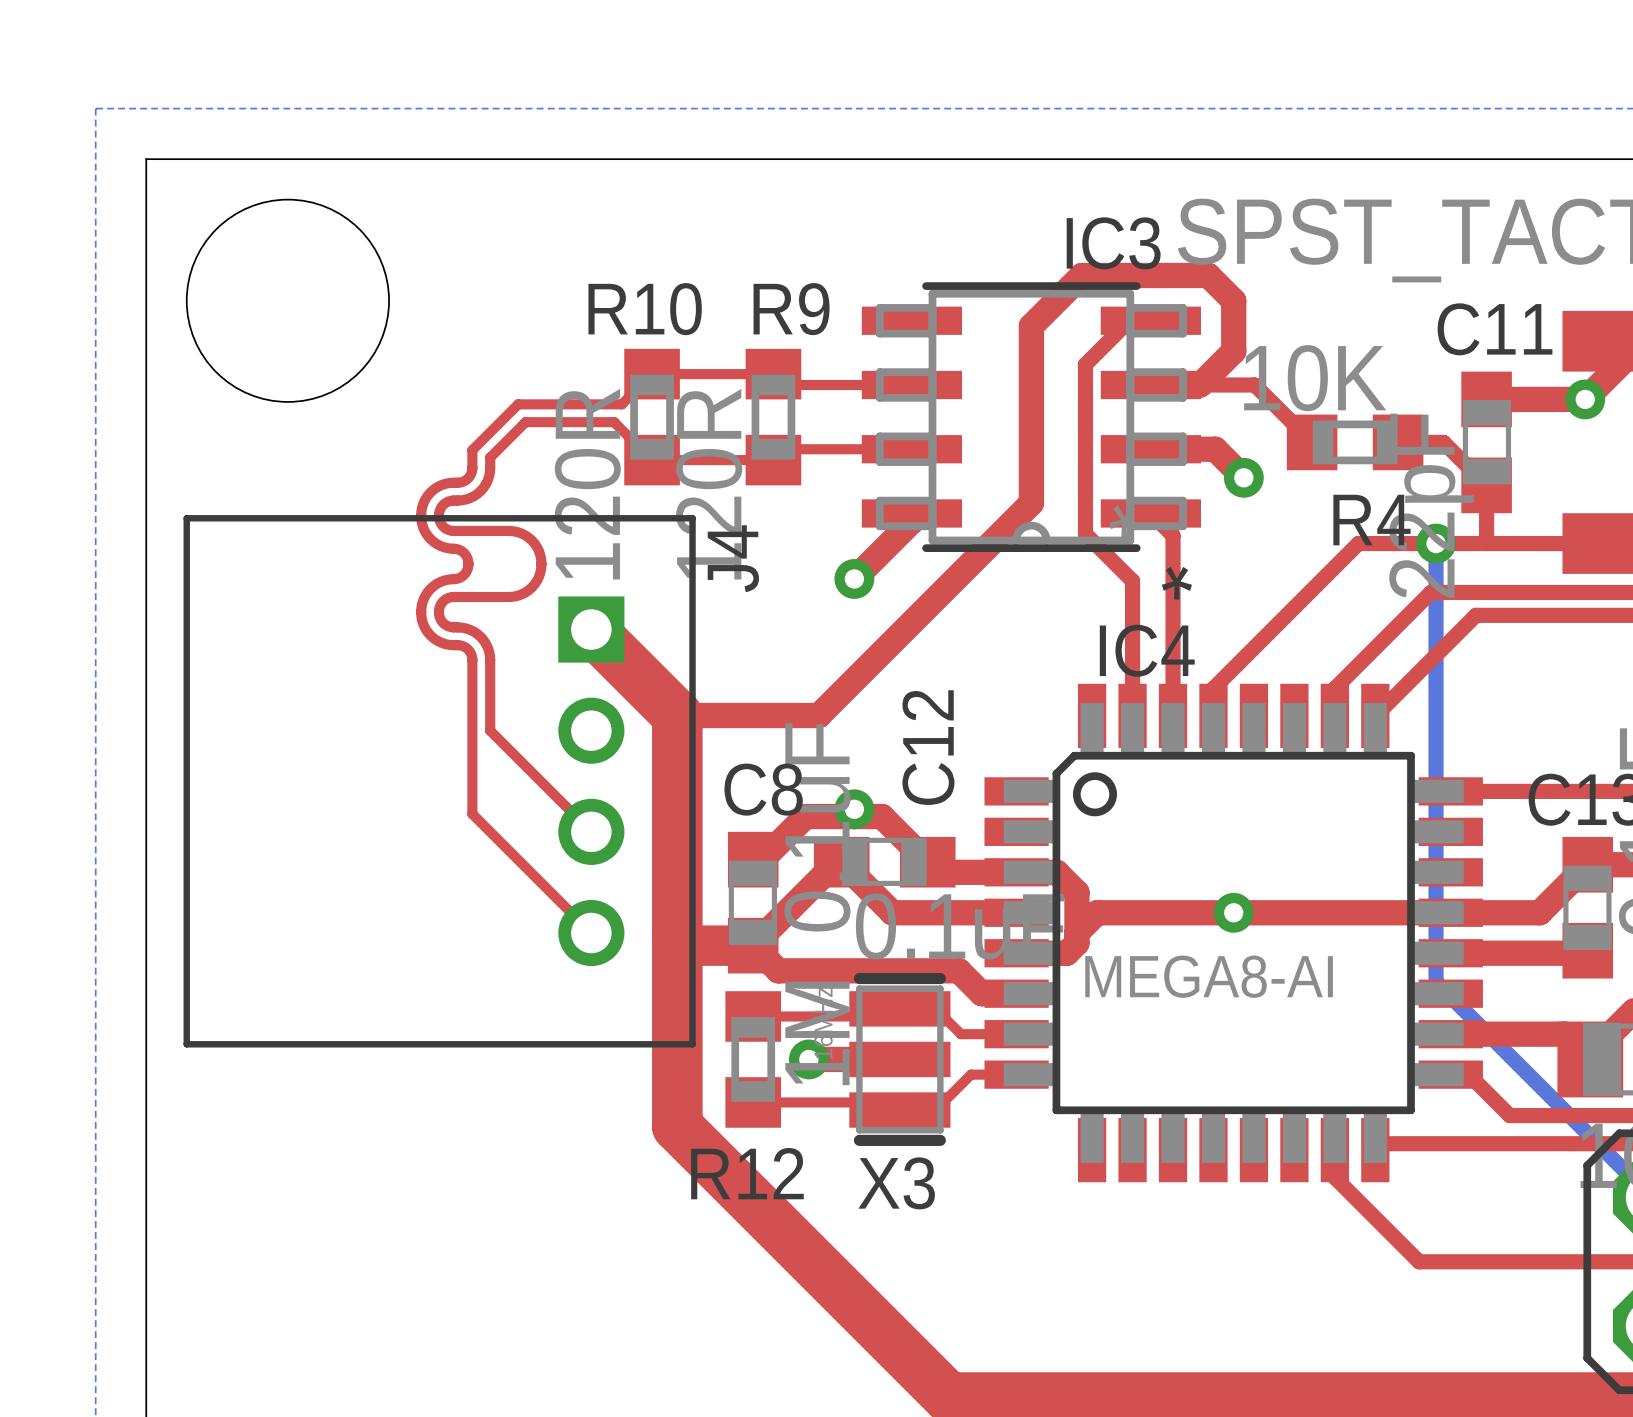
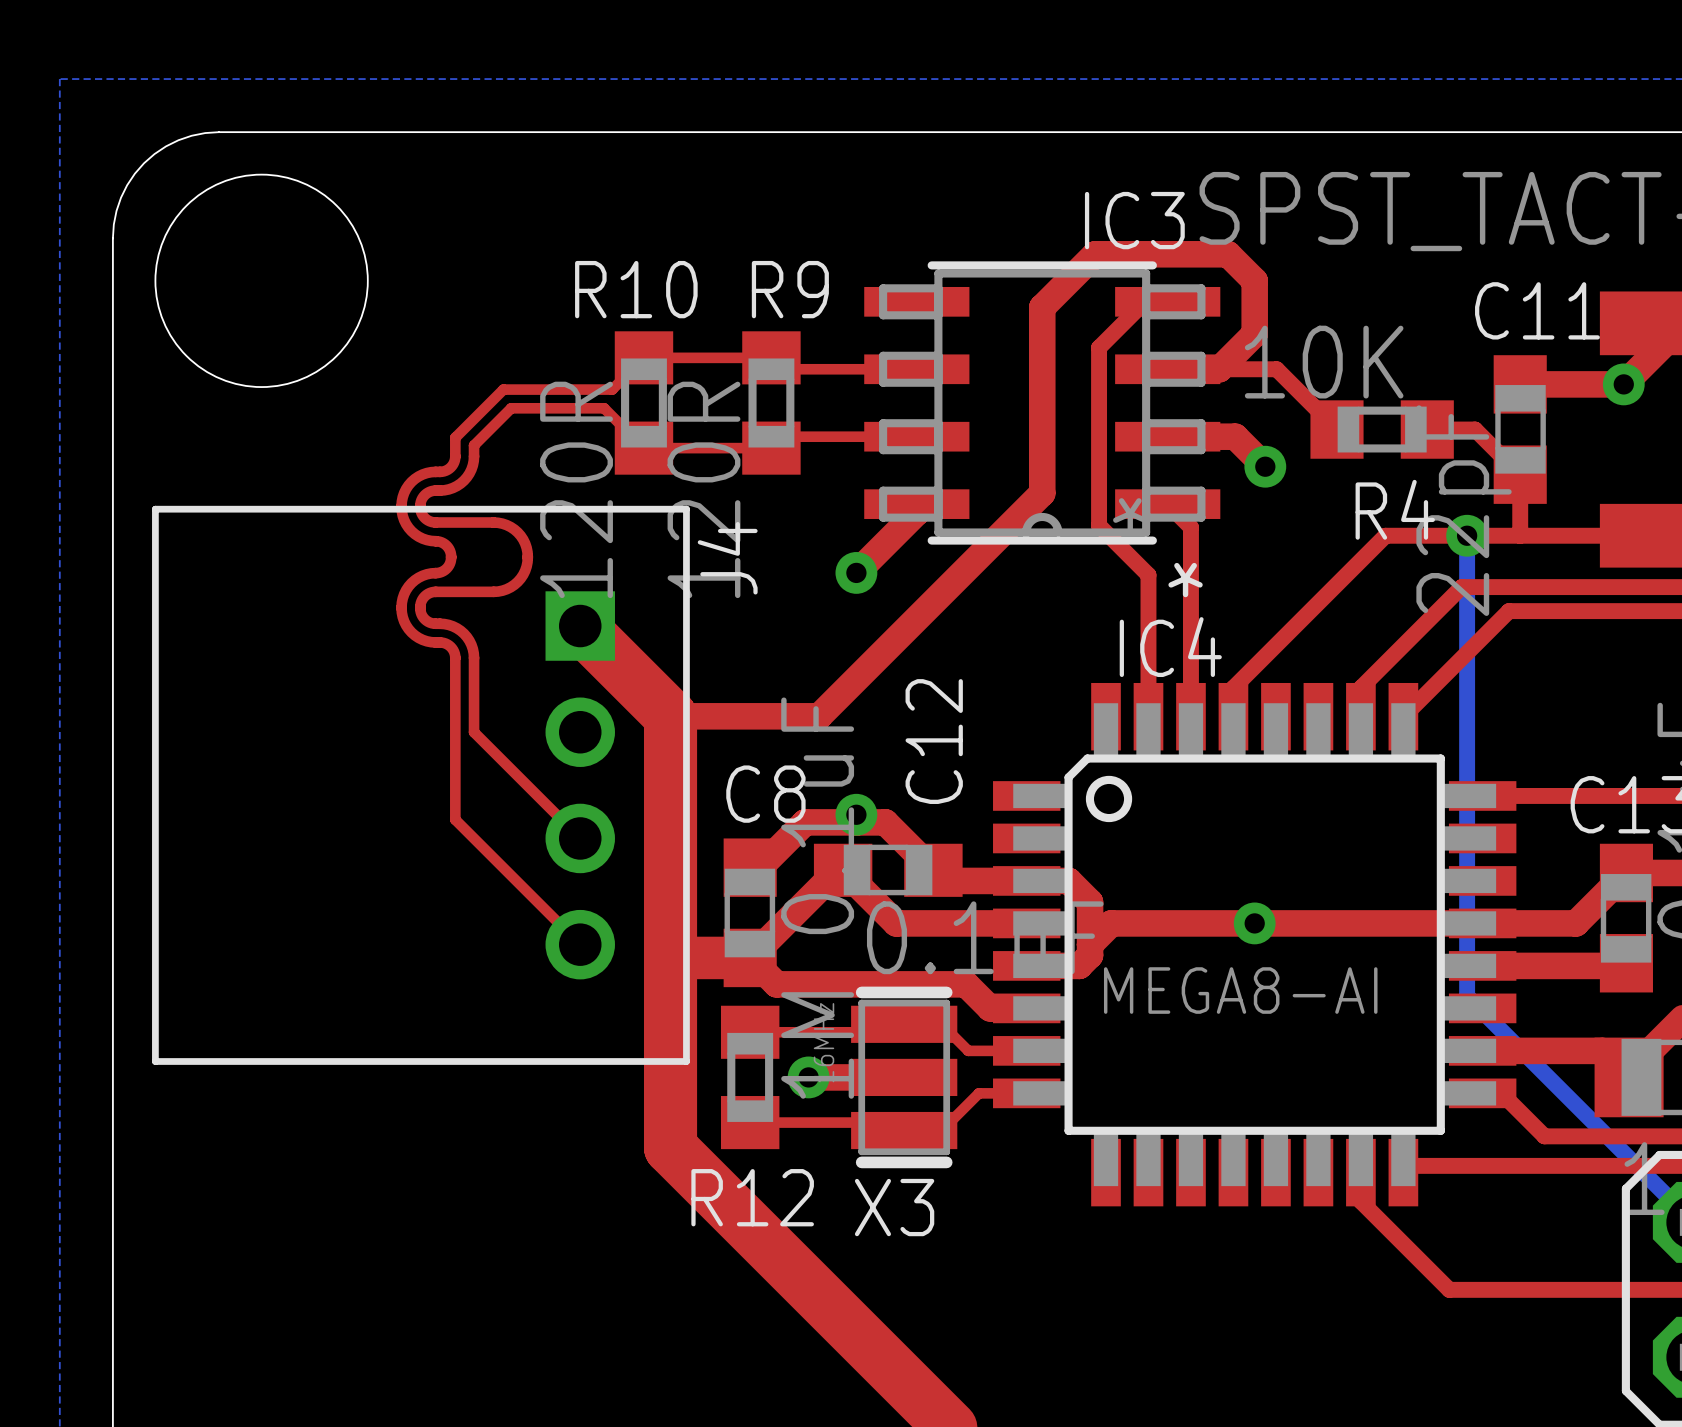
board edge: (247, 159) (146, 159) (146, 260) -> (219, 132) (191, 135) (178, 140) (166, 146) (144, 163) (127, 185) (121, 197) (116, 210) (112, 238)

